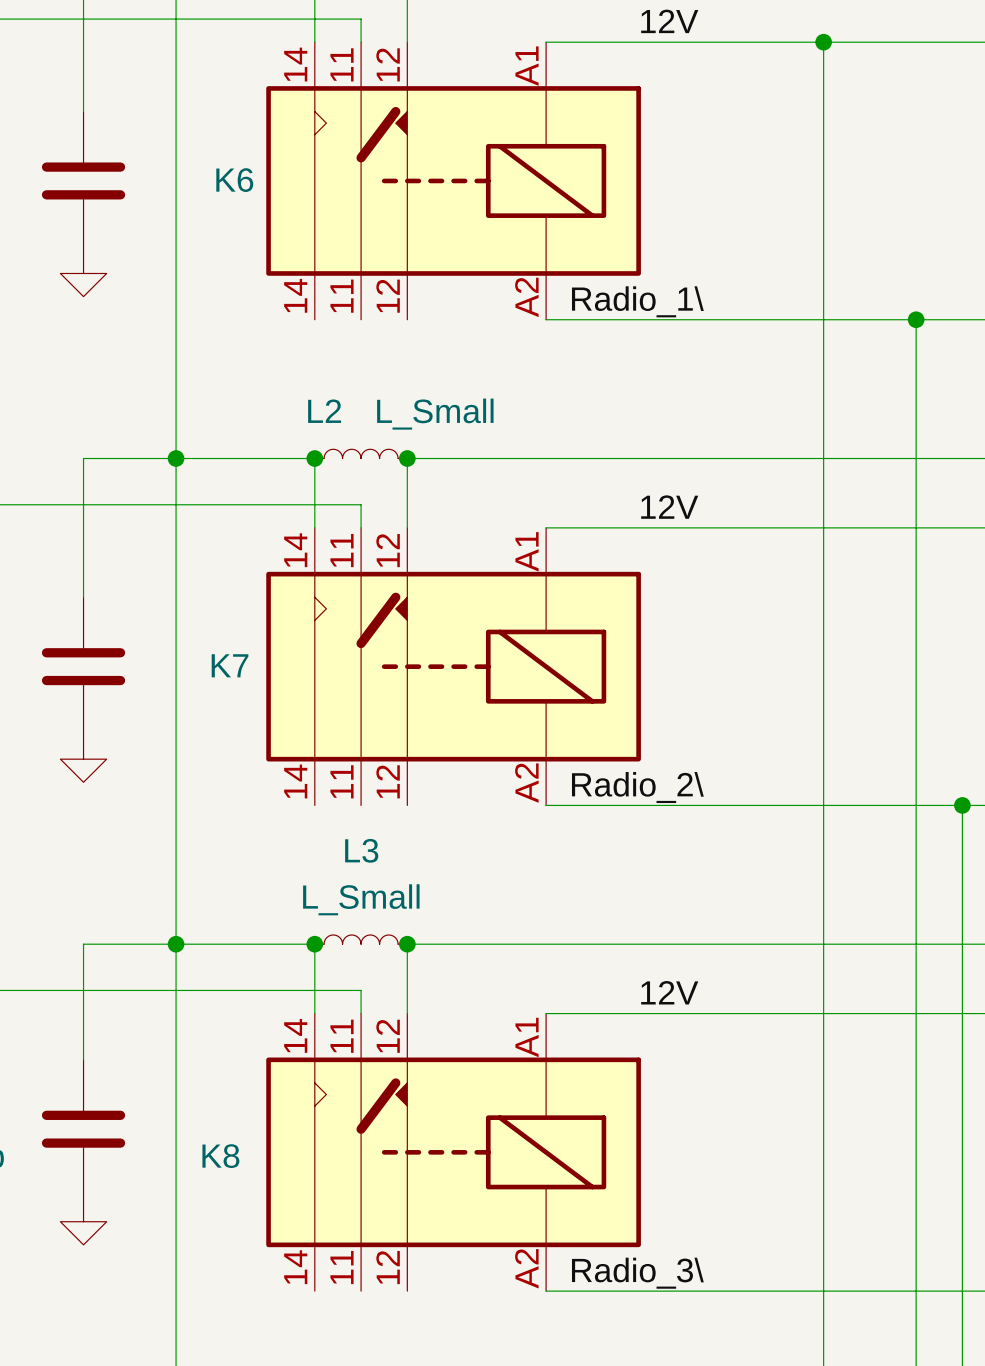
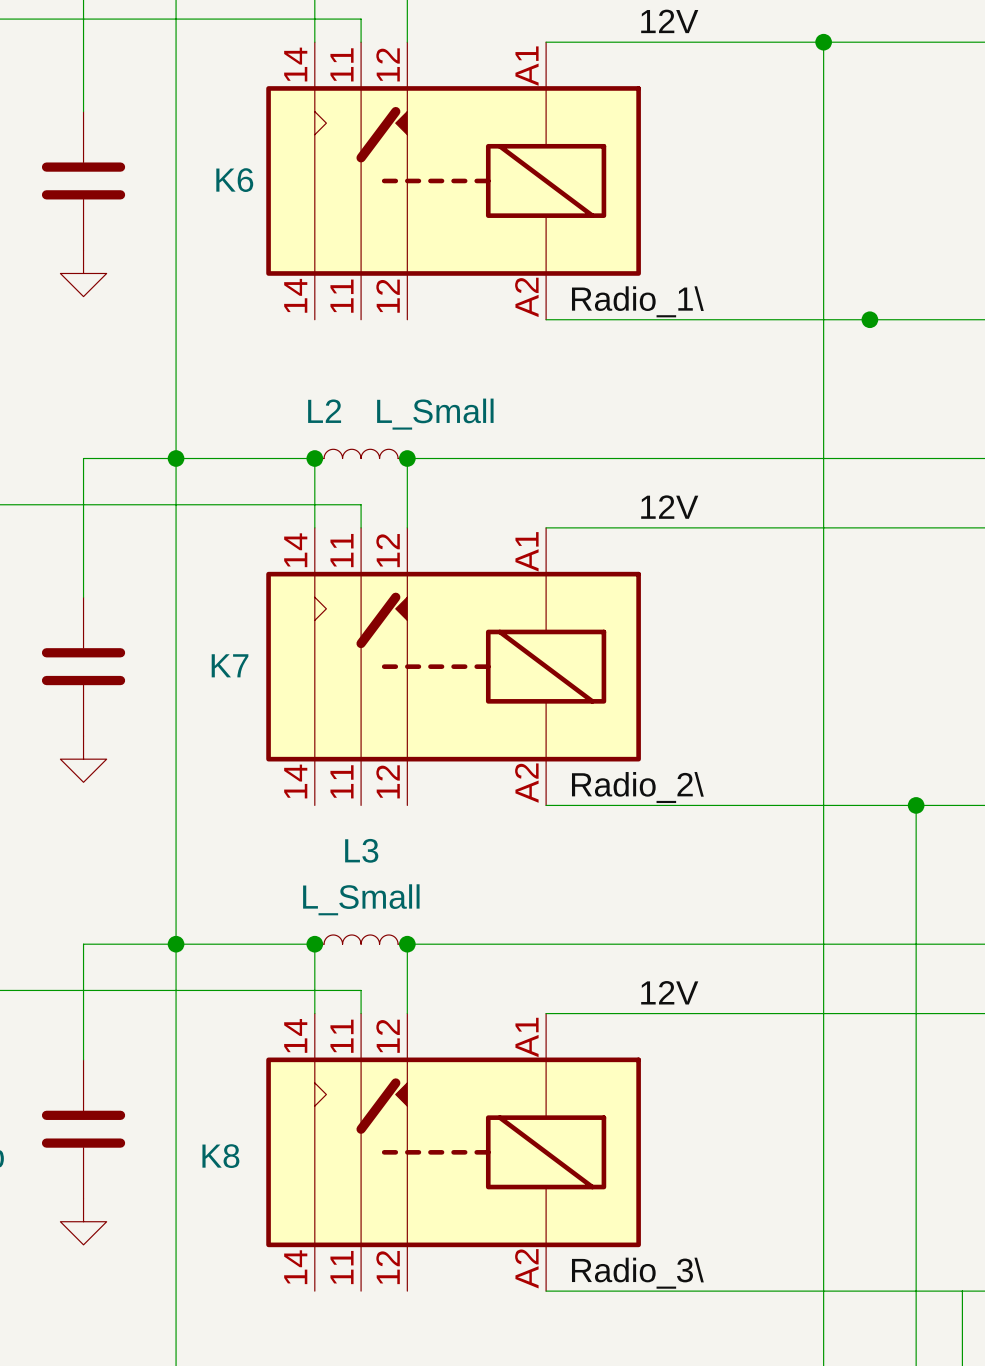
wire: (916, 319) (916, 805) -> none
junction position: (916, 319) -> (869, 319)
wire: (962, 805) (962, 1291) -> none
junction position: (962, 805) -> (916, 805)

